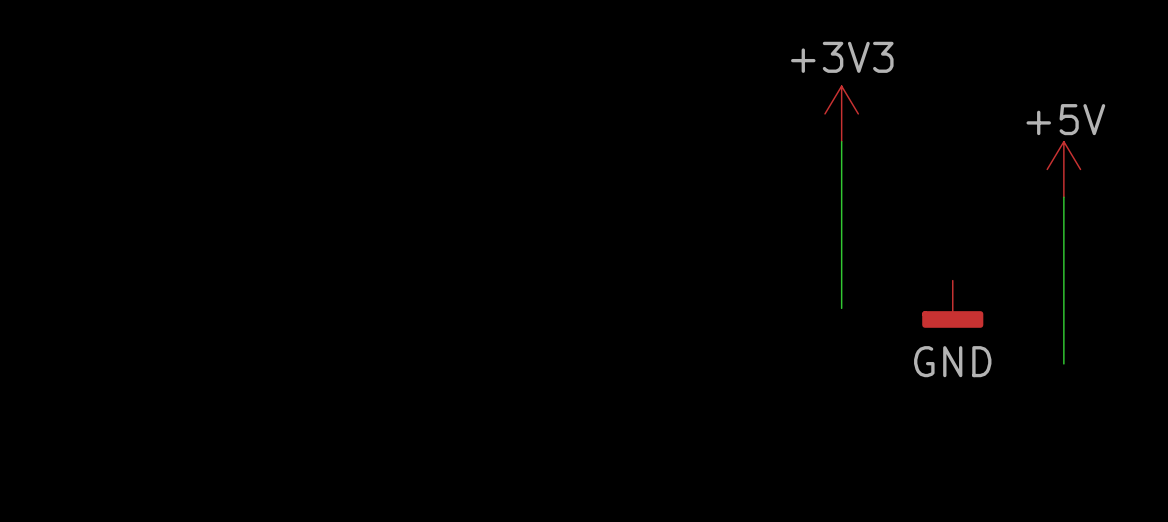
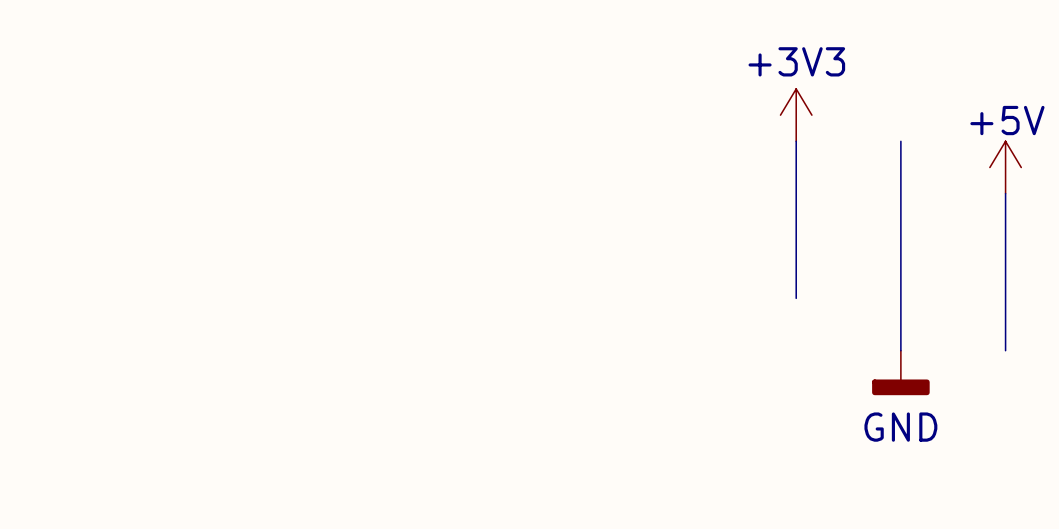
wire: none -> (900, 141) (900, 350)
power symbol position: GND (952, 304) -> GND (900, 372)

